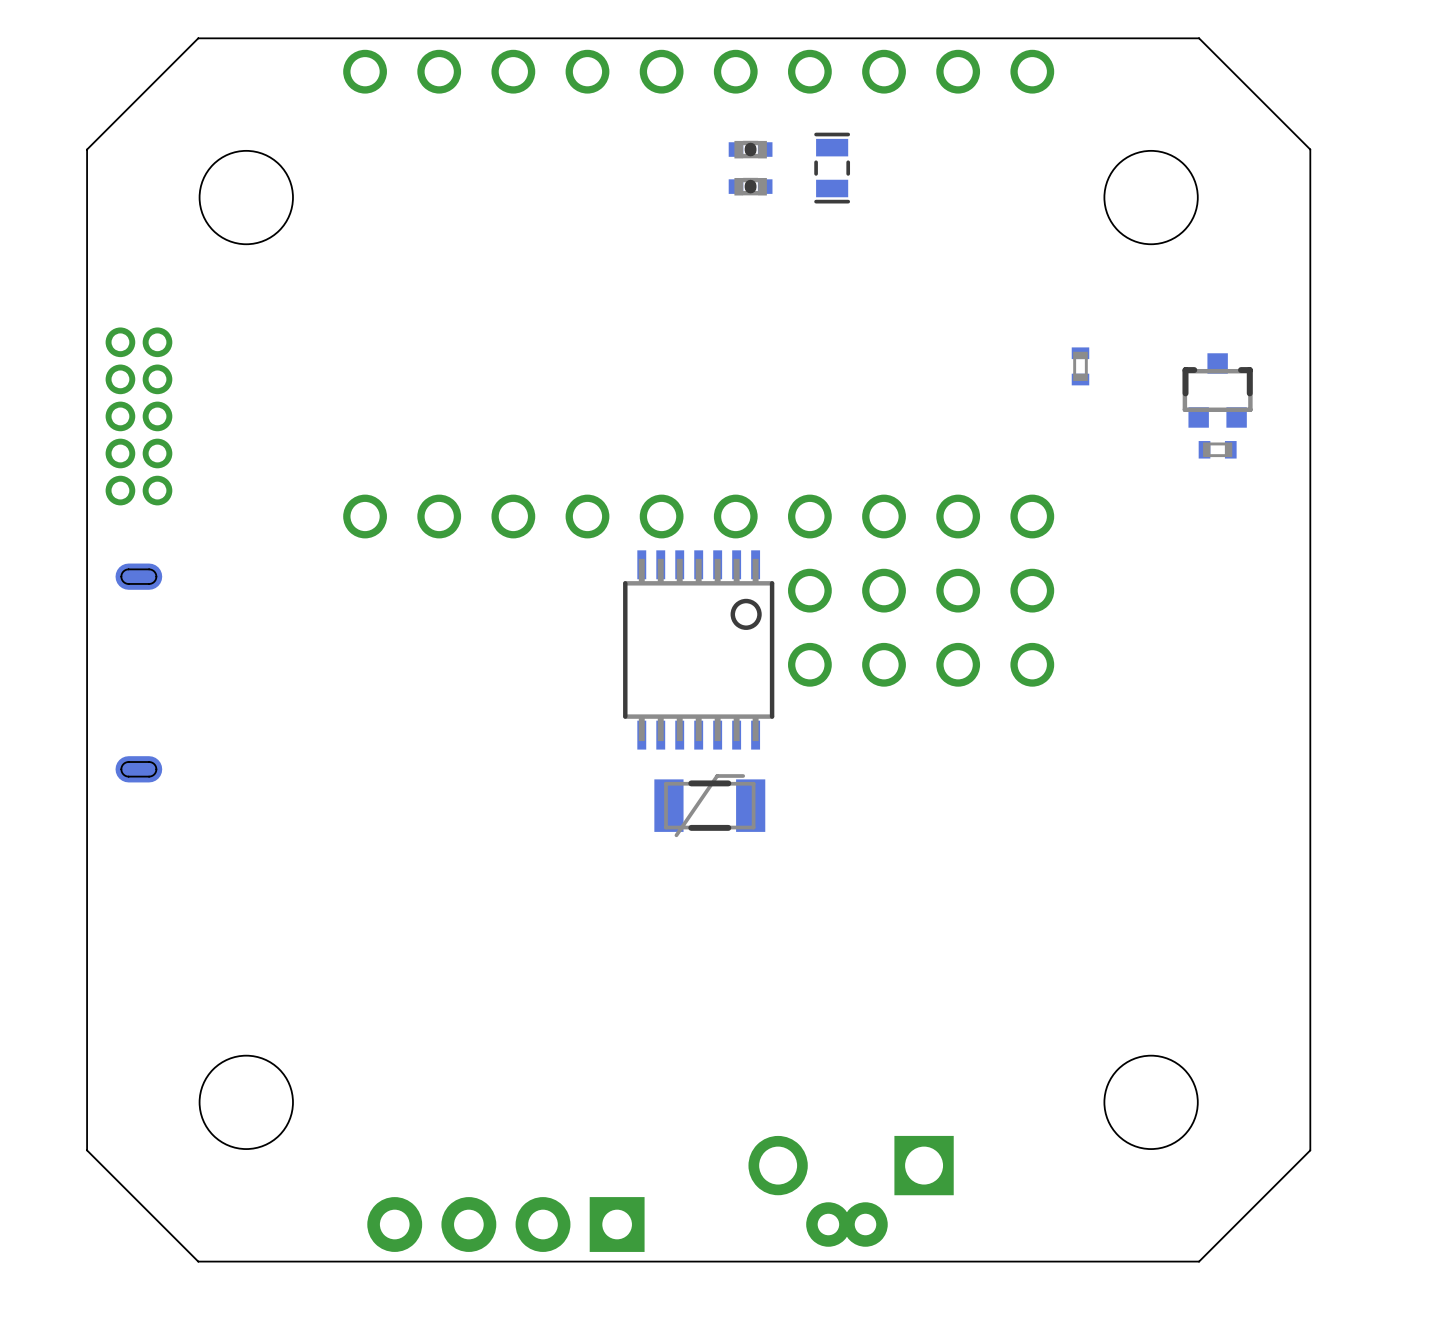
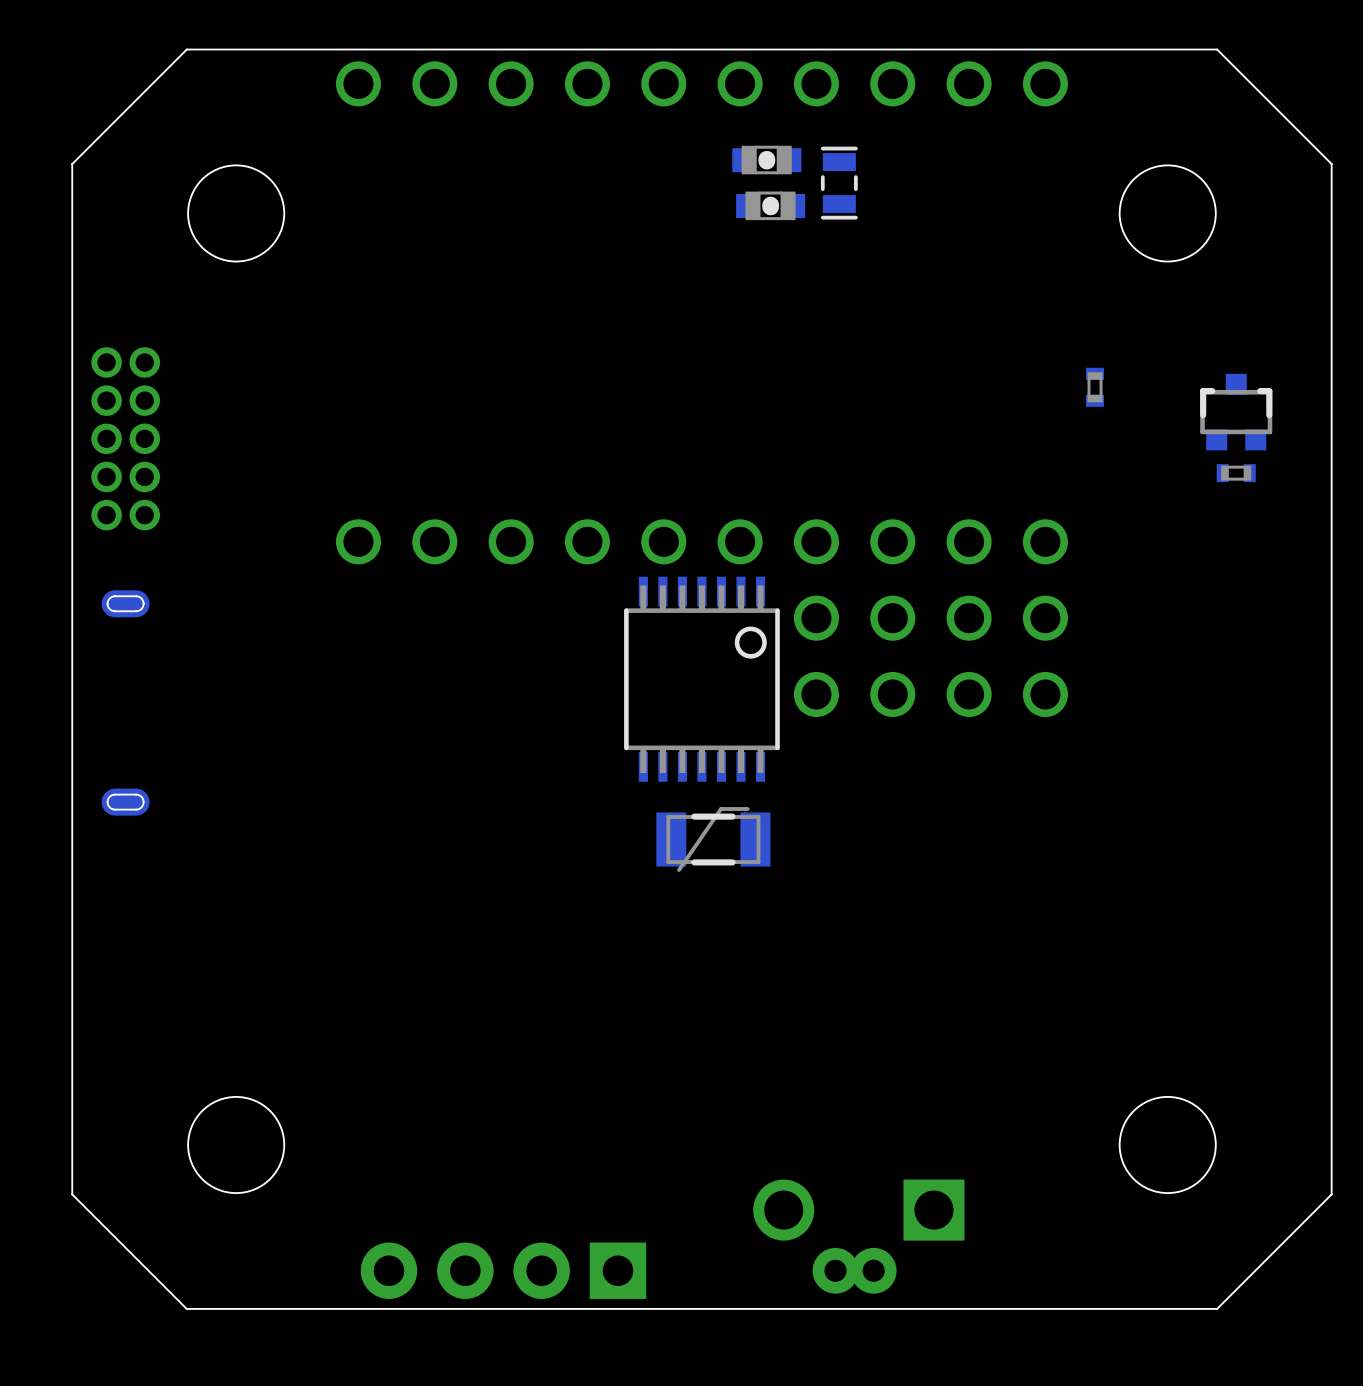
part footprint: [728, 140, 773, 159] -> [732, 145, 802, 175]
part footprint: [728, 177, 773, 196] -> [736, 191, 806, 221]

